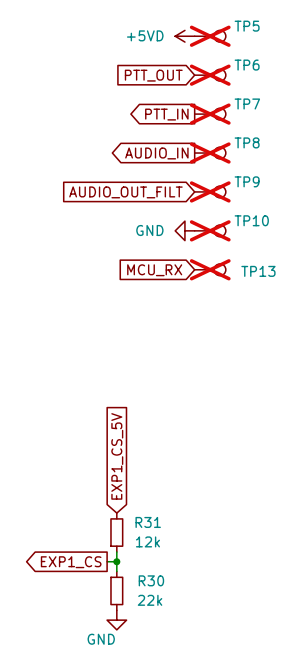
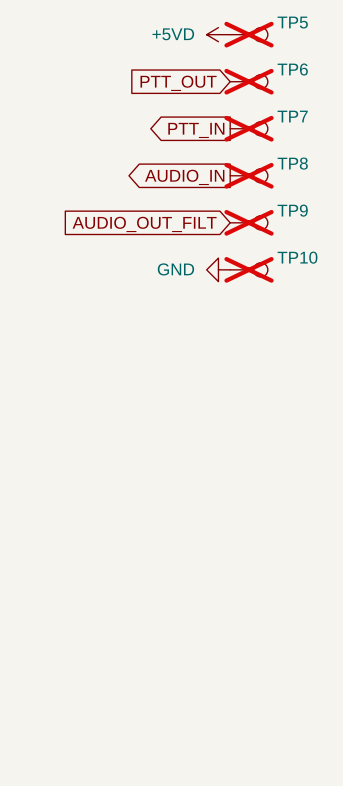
TP13: (210, 269) -> none
global label: MCU_RX (154, 270) -> none
global label: EXP1_CS_5V (117, 456) -> none
R31: 12k (116, 532) -> none
wire: (116, 552) (116, 571) -> none
wire: (107, 561) (116, 561) -> none
junction: (116, 561) -> none
global label: EXP1_CS (71, 562) -> none
R30: 22k (116, 590) -> none
power symbol: GND (116, 620) -> none

